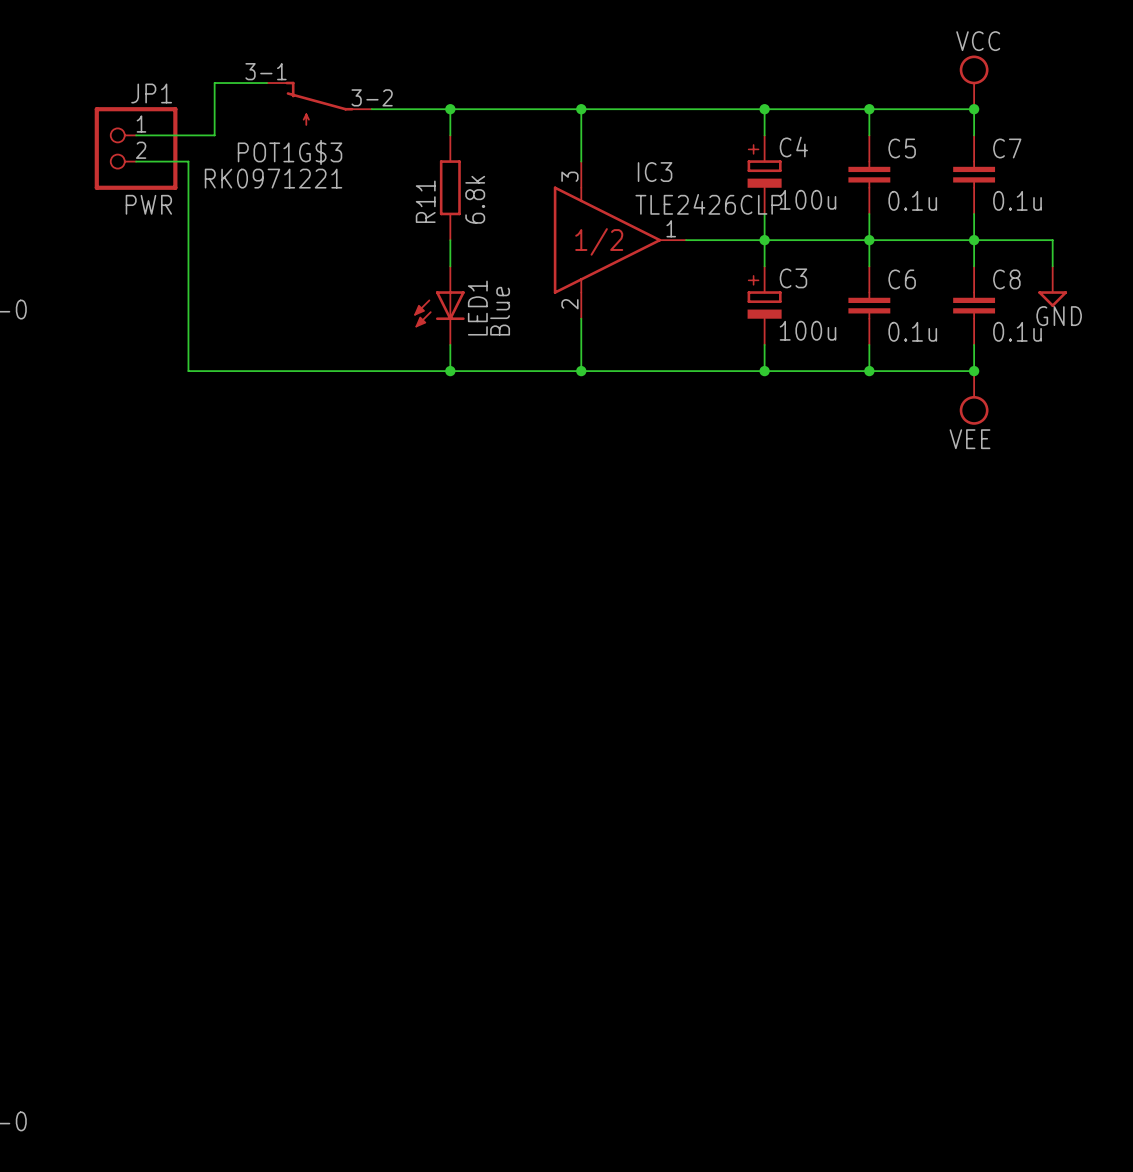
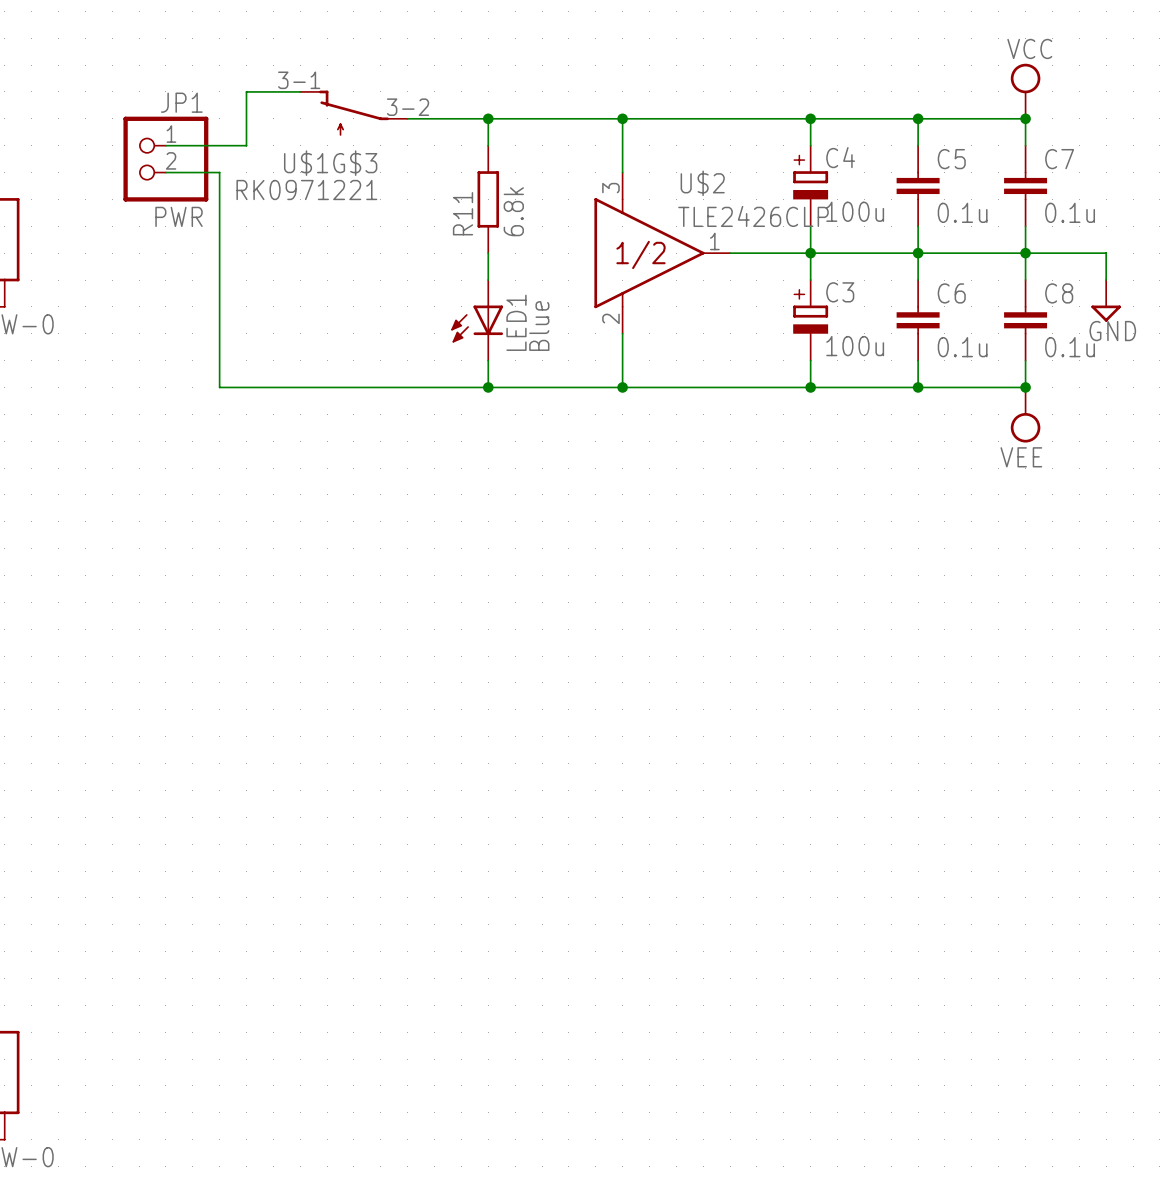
POT1G$3 name: POT1G$3 (290, 152) -> U$1G$3 (330, 163)
IC3 name: IC3 (655, 172) -> U$2 (702, 183)

